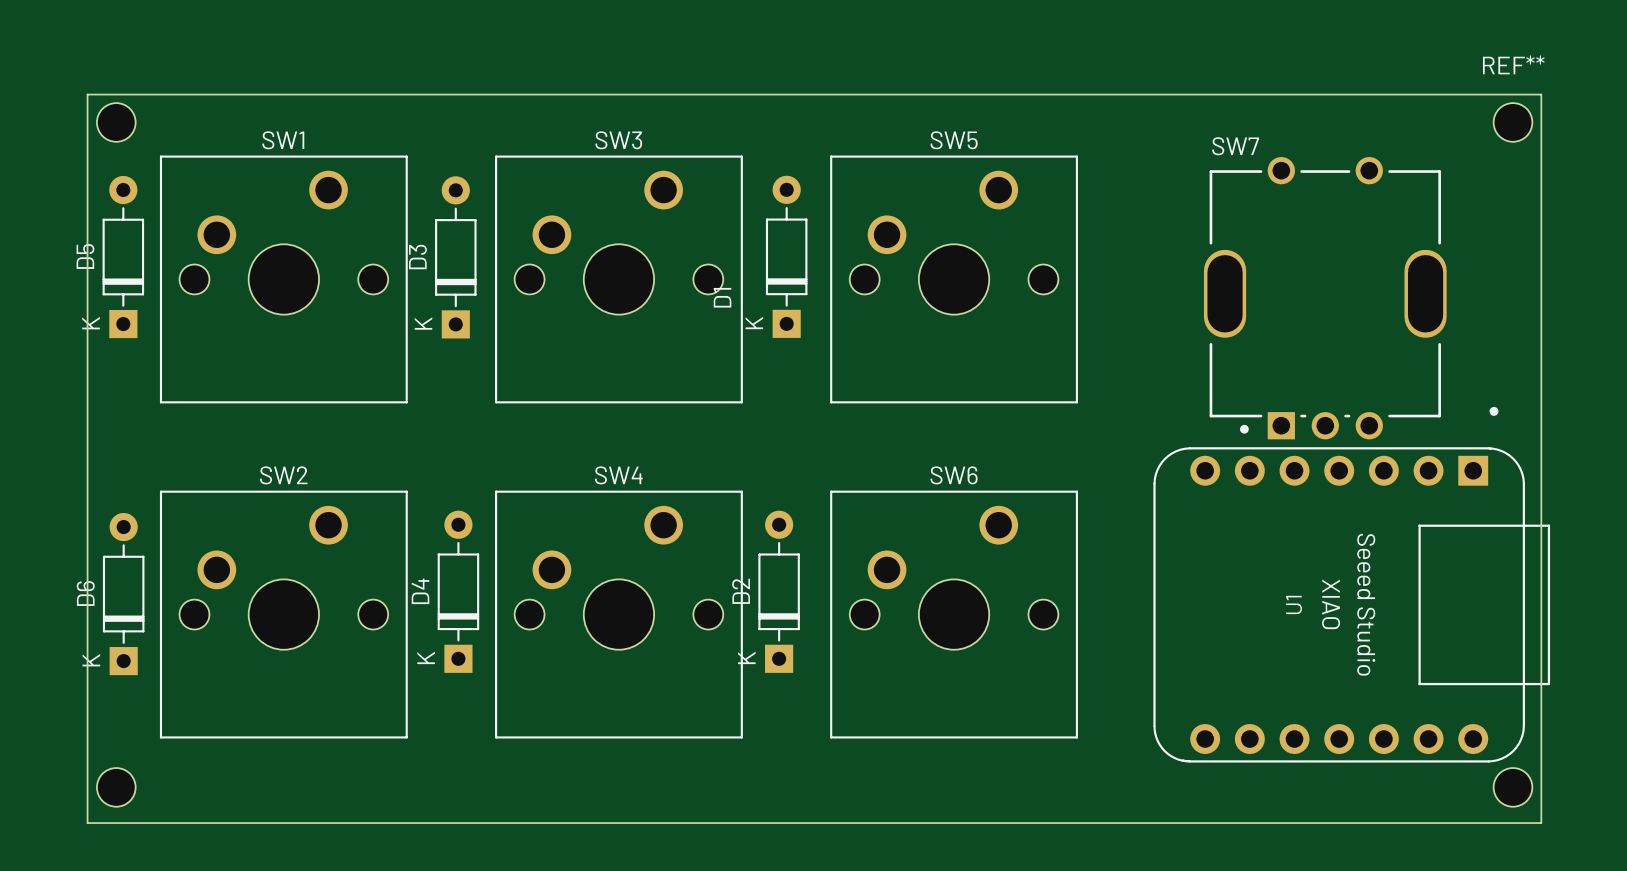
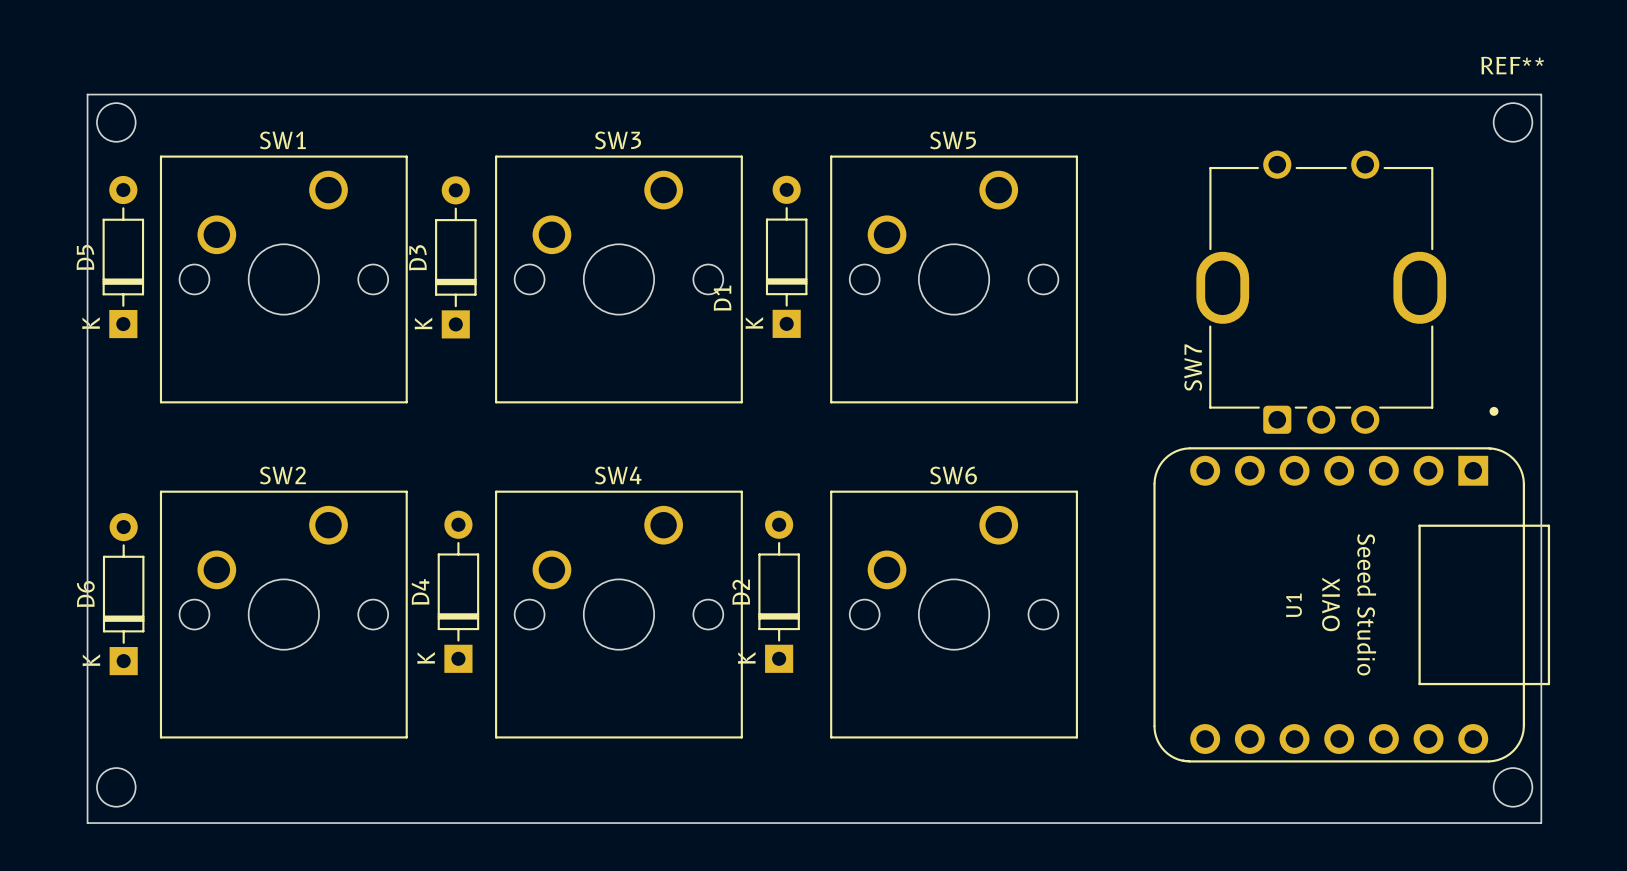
SW7 name position: SW7 (1235, 146) -> SW7 (1193, 367)
SW7 footprint: [1203, 157, 1447, 440] -> [1196, 150, 1447, 434]

